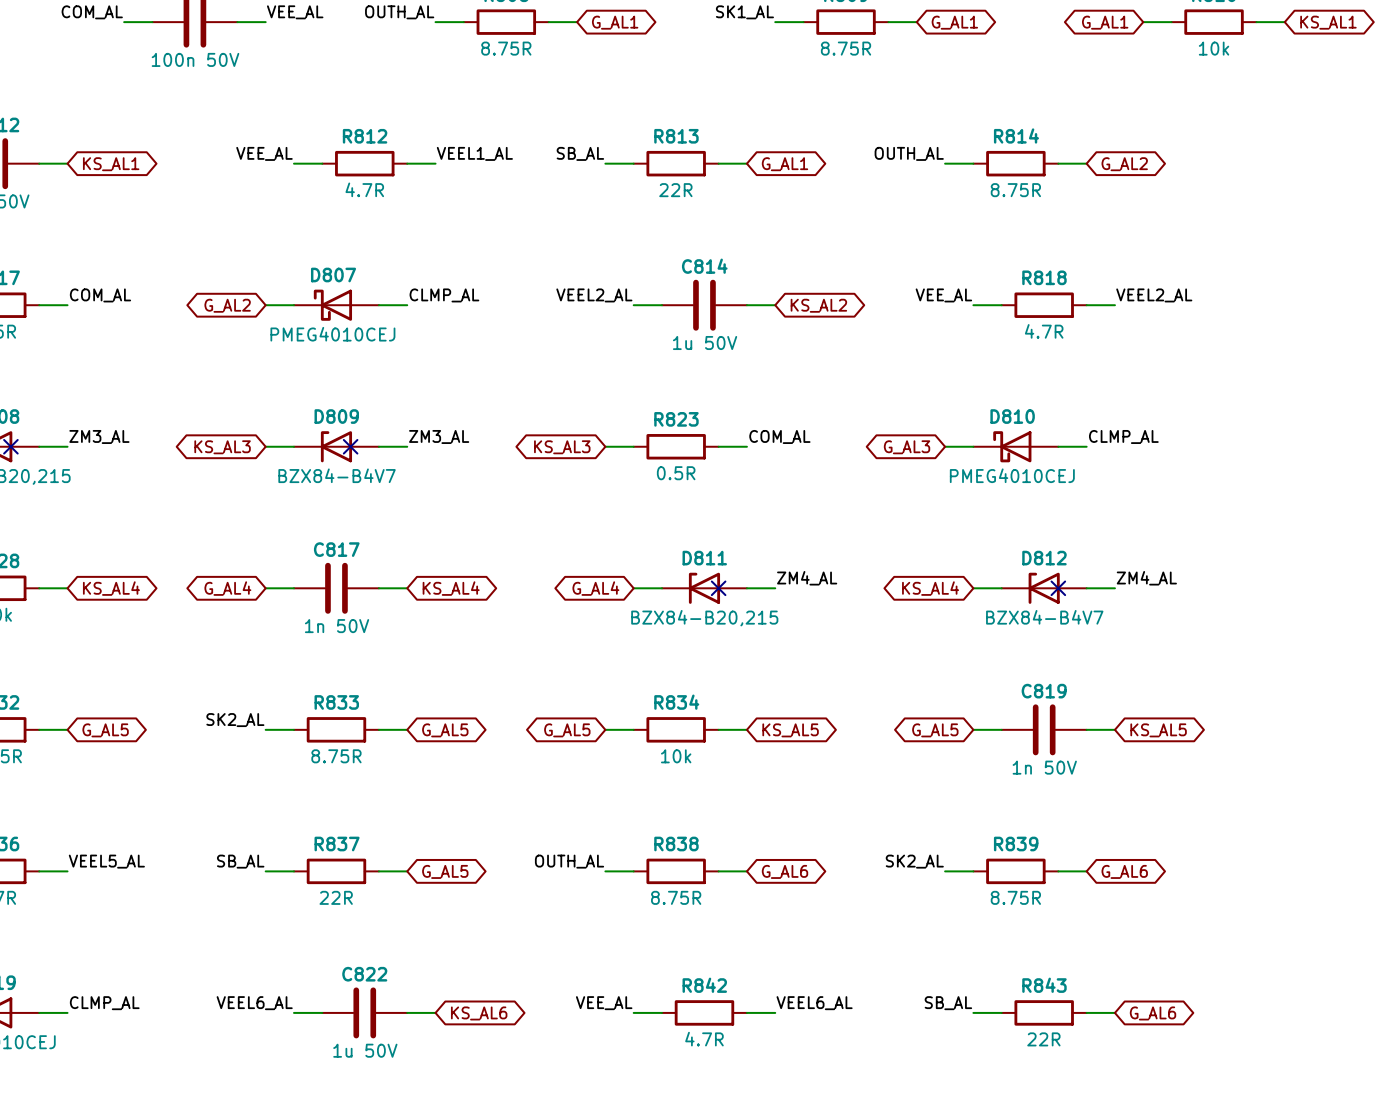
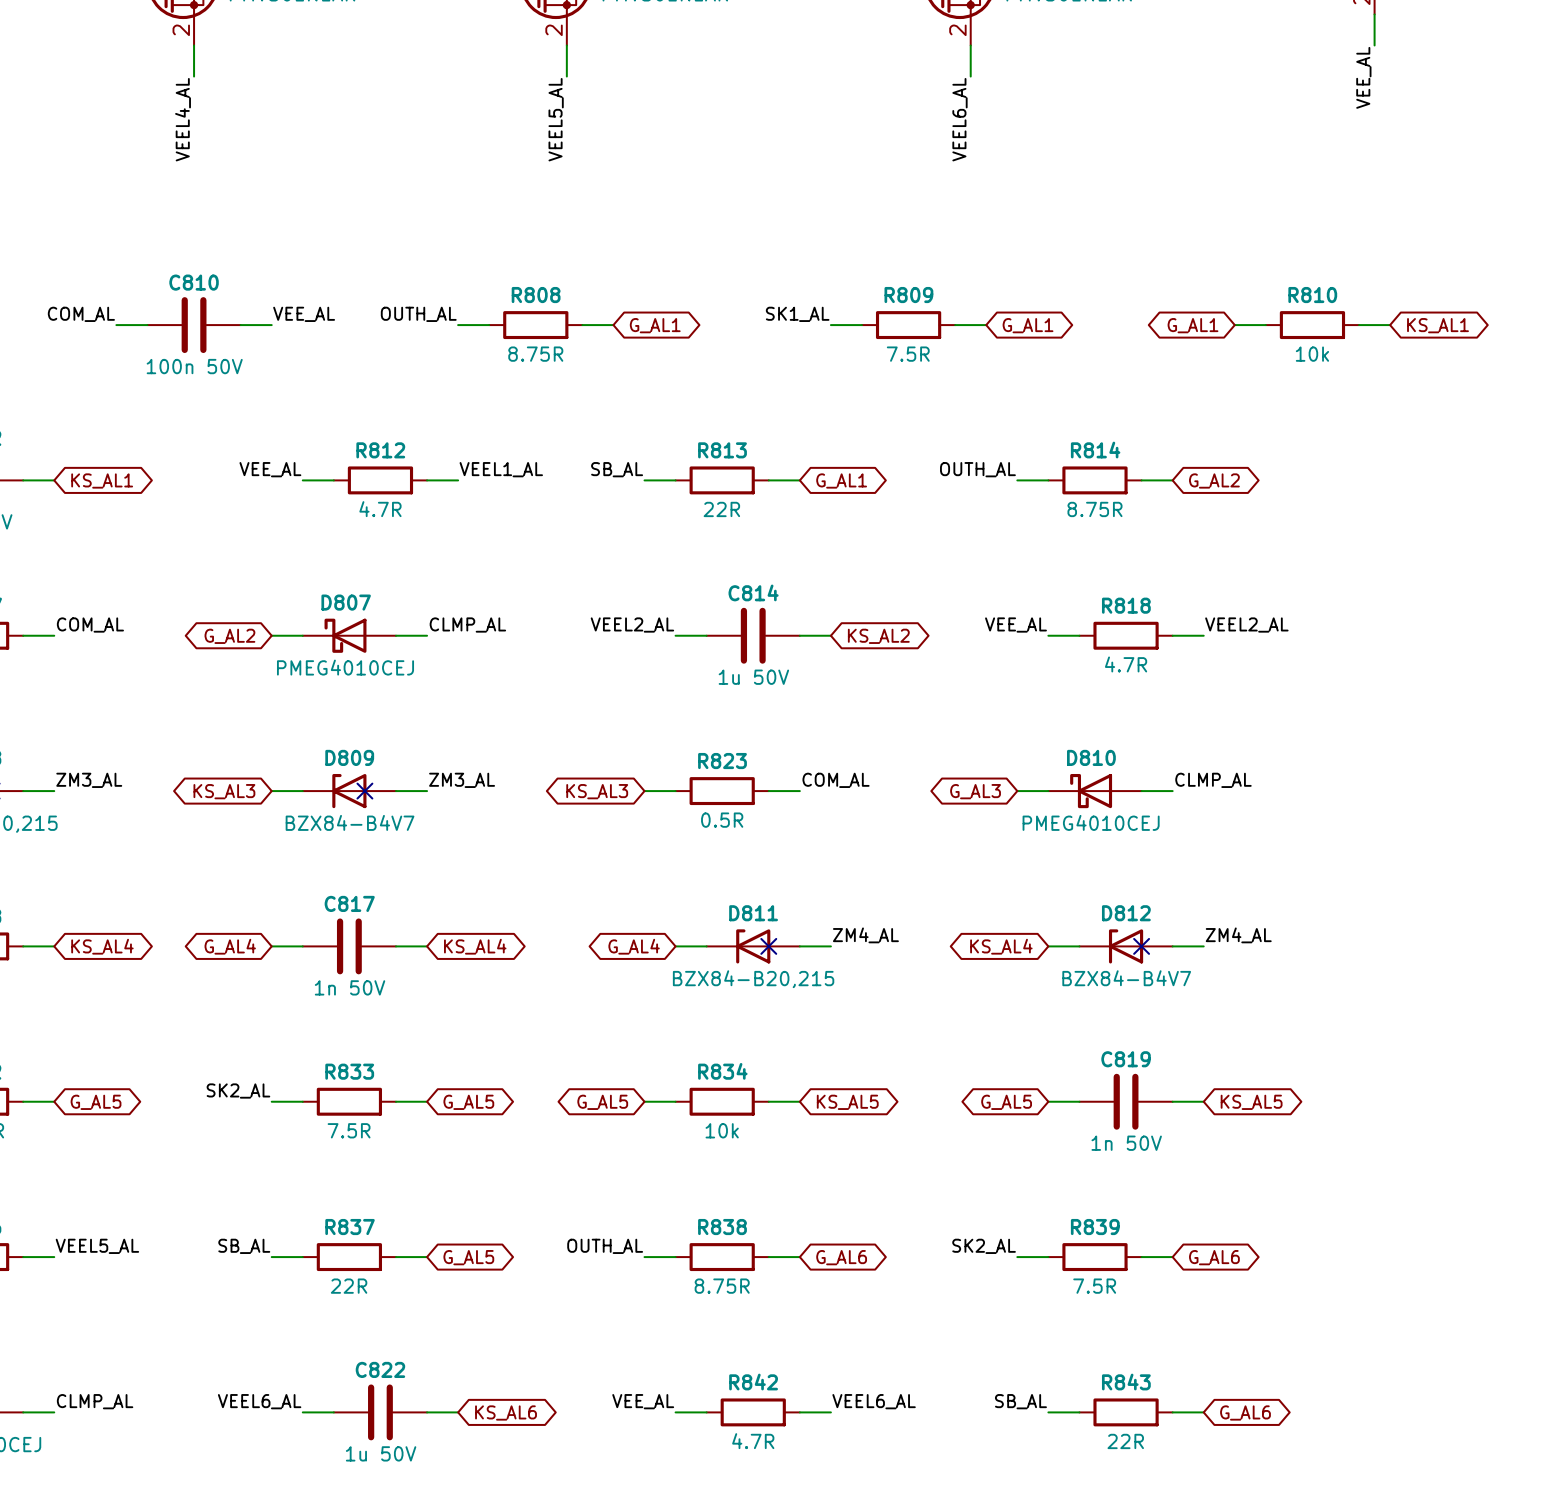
R809 value: 8.75R (846, 48) -> 7.5R (908, 354)
R833 value: 8.75R (336, 756) -> 7.5R (349, 1130)
R839 value: 8.75R (1015, 897) -> 7.5R (1094, 1286)

